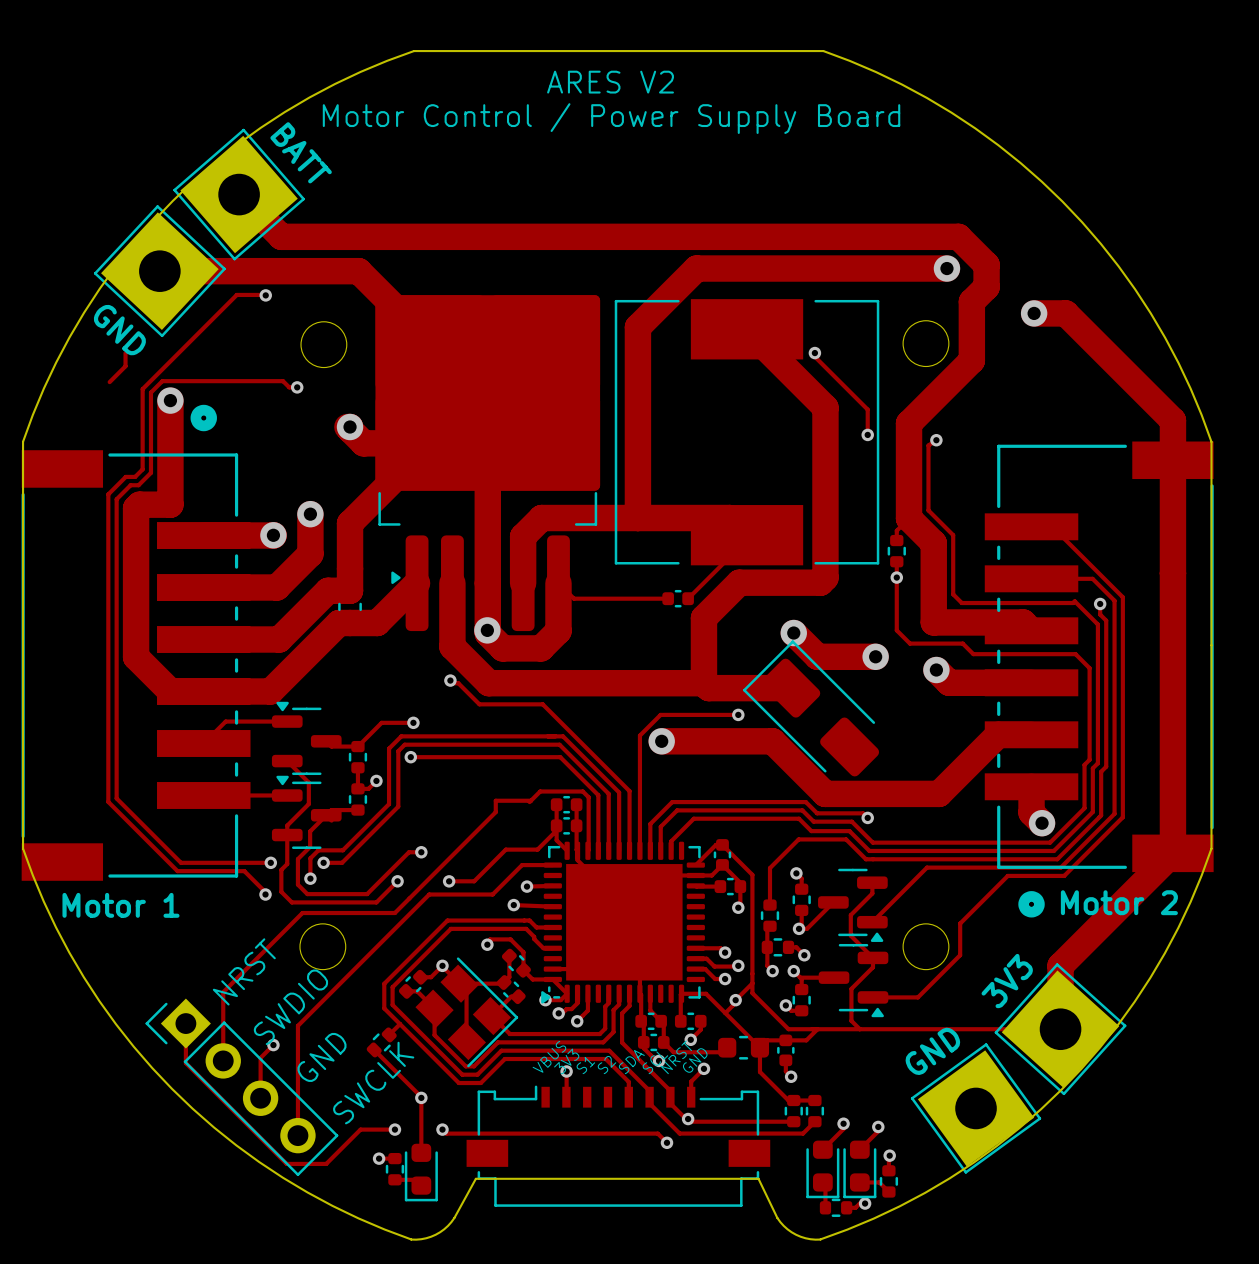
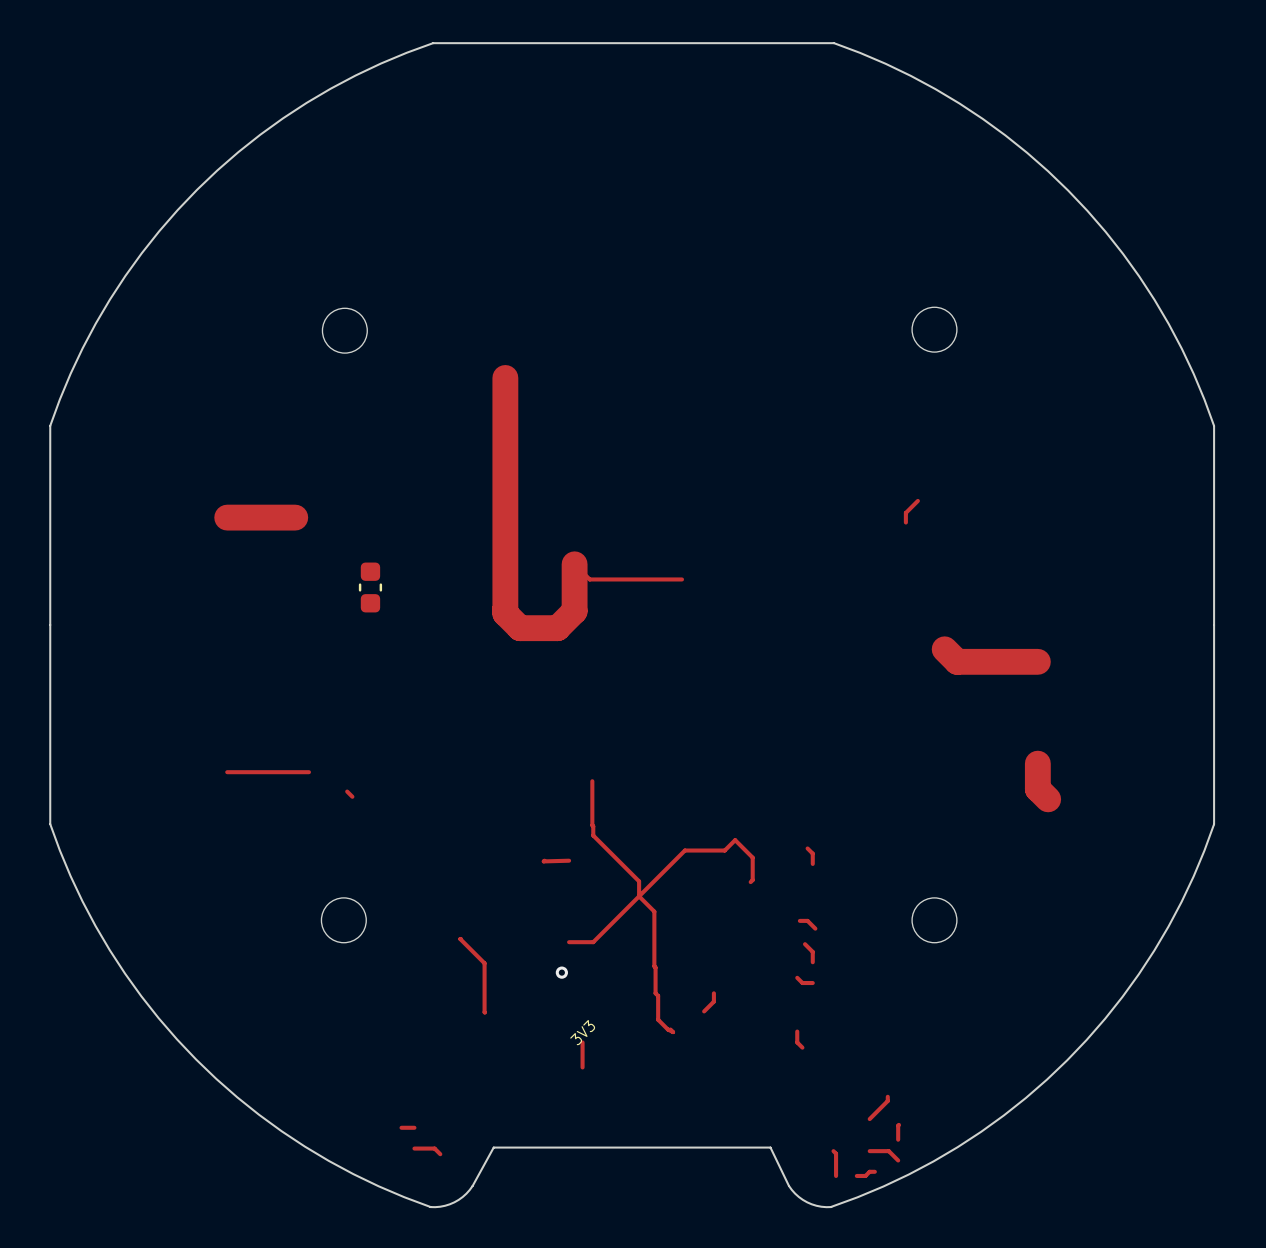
text: ARES V2 (610, 82) -> none
text: Motor Control / Power Supply Board (611, 118) -> none
text: BATT (301, 152) -> none
track: (239, 194) (281, 236) (958, 236) (986, 264) (986, 287) (971, 301) (971, 360) (909, 423) (909, 518) (933, 543) (933, 622) (1023, 622) (1031, 630) -> none
part: (239, 194) -> none
track: (946, 268) (696, 268) (637, 327) (637, 518) -> none
via: (946, 268) -> none
track: (159, 271) (358, 271) (430, 342) -> none
part: (159, 271) -> none
track: (265, 295) (236, 294) (142, 389) (142, 469) (135, 476) (125, 476) (108, 494) (108, 801) (177, 871) (244, 871) (265, 892) (265, 894) -> none
via: (265, 295) -> none
track: (1034, 313) (1065, 313) (1172, 420) (1172, 853) (1060, 965) (1060, 1029) (788, 1029) (752, 993) (752, 874) (722, 844) (716, 844) (695, 865) -> none
via: (1034, 313) -> none
track: (747, 329) (825, 407) (825, 577) (820, 582) (739, 582) (703, 618) (703, 683) -> none
text: GND (119, 330) -> none
track: (125, 353) (125, 366) (109, 382) -> none
track: (814, 353) (814, 356) (867, 409) (867, 434) -> none
via: (814, 353) -> none
track: (297, 387) (289, 387) (283, 381) (162, 381) (150, 392) (150, 472) (138, 485) (130, 485) (116, 499) (116, 798) (180, 862) (270, 862) -> none
via: (297, 387) -> none
track: (170, 400) (170, 504) (139, 504) (136, 508) (136, 657) (170, 691) (270, 691) (339, 623) (377, 623) (417, 583) -> none
via: (170, 400) -> none
track: (347, 427) (350, 427) (350, 429) (363, 443) (430, 443) (350, 523) (350, 590) (328, 590) (279, 639) (203, 639) -> none
via: (350, 427) -> none
part: (747, 432) -> none
via: (867, 434) -> none
track: (933, 440) (936, 440) (928, 445) (928, 510) (953, 535) (953, 594) (961, 603) (1073, 603) (1074, 601) (1097, 624) (1097, 763) (1092, 768) (1092, 812) (1053, 850) (869, 850) (849, 831) (811, 831) (798, 818) (693, 818) (671, 841) (671, 850) -> none
via: (936, 440) -> none
part: (487, 463) -> none
track: (310, 514) (310, 554) (276, 587) (203, 587) -> none
via: (310, 514) -> none
track: (1031, 526) (1052, 526) (1122, 597) (1122, 817) (1064, 875) (1007, 875) (960, 923) (960, 955) (917, 997) (873, 997) -> none
via: (273, 535) -> none
part: (896, 551) -> none
track: (896, 561) (896, 630) (909, 643) (962, 643) (973, 654) (1075, 654) (1089, 668) (1089, 759) (1084, 764) (1084, 808) (1050, 842) (872, 842) (851, 821) (813, 821) (802, 810) (677, 810) (660, 826) (660, 850) -> none
via: (896, 577) -> none
track: (1031, 578) (1092, 578) (1114, 600) (1114, 813) (1060, 867) (926, 867) (872, 922) -> none
track: (452, 583) (452, 646) (488, 683) (703, 683) -> none
track: (523, 583) (523, 536) (541, 518) (729, 518) (747, 535) (747, 539) (688, 598) -> none
part: (678, 598) -> none
track: (1100, 603) (1100, 614) (1106, 620) (1106, 766) (1101, 771) (1101, 815) (1057, 859) (865, 859) (846, 839) (798, 839) (770, 868) (770, 905) -> none
via: (1100, 603) -> none
via: (487, 630) -> none
track: (793, 633) (817, 656) (875, 656) -> none
via: (793, 633) -> none
part: (136, 642) -> none
via: (875, 656) -> none
via: (936, 670) -> none
part: (1099, 679) -> none
via: (450, 680) -> none
track: (453, 680) (450, 680) (458, 683) (479, 704) (542, 704) (629, 791) (629, 850) -> none
track: (703, 683) (708, 688) (790, 688) -> none
part: (811, 708) -> none
track: (738, 714) (660, 714) (639, 735) (639, 850) -> none
via: (738, 714) -> none
track: (287, 721) (225, 721) (203, 743) -> none
track: (413, 722) (381, 722) (357, 746) (331, 746) (326, 741) -> none
via: (413, 722) -> none
track: (1031, 734) (998, 734) (939, 793) (825, 793) (772, 741) (661, 741) -> none
part: (306, 738) -> none
via: (661, 741) -> none
part: (357, 757) -> none
track: (410, 757) (560, 757) (598, 795) (598, 850) -> none
via: (410, 757) -> none
track: (287, 761) (308, 782) (308, 804) (287, 825) (287, 864) (281, 869) (281, 891) (291, 902) (376, 902) (397, 881) -> none
track: (357, 767) (357, 788) (368, 788) (376, 780) -> none
via: (376, 780) -> none
part: (357, 799) -> none
track: (530, 800) (495, 800) (495, 812) (394, 913) (302, 913) (223, 992) (223, 1060) -> none
track: (529, 802) (540, 791) (582, 791) (588, 797) (587, 850) -> none
track: (556, 804) (556, 840) (567, 850) -> none
part: (566, 804) -> none
track: (357, 810) (331, 810) (310, 831) (310, 846) (297, 859) (297, 884) (307, 894) (367, 894) (408, 852) (421, 852) -> none
part: (306, 812) -> none
track: (867, 817) (863, 813) (817, 813) (805, 802) (672, 802) (650, 824) (650, 850) -> none
via: (867, 817) -> none
via: (1042, 823) -> none
part: (566, 825) -> none
track: (556, 830) (537, 849) (505, 849) (474, 881) (449, 881) -> none
track: (608, 850) (608, 793) (559, 744) (404, 744) (398, 751) (398, 806) (342, 862) (323, 862) -> none
track: (619, 850) (619, 792) (563, 736) (401, 736) (389, 748) (389, 804) (342, 850) (318, 850) (310, 858) (310, 878) -> none
via: (421, 852) -> none
part: (722, 854) -> none
via: (270, 862) -> none
via: (323, 862) -> none
track: (552, 865) (522, 865) (492, 894) (429, 894) (297, 1025) (297, 1135) -> none
via: (796, 873) -> none
via: (310, 878) -> none
via: (397, 881) -> none
via: (449, 881) -> none
track: (872, 882) (872, 893) (850, 915) (850, 935) (873, 957) (873, 967) (851, 988) (851, 1020) (859, 1029) -> none
track: (695, 885) (720, 886) -> none
via: (527, 886) -> none
part: (730, 886) -> none
via: (265, 894) -> none
part: (801, 899) -> none
track: (833, 902) (806, 928) (799, 928) (801, 926) (801, 910) -> none
text: Motor 2 (1119, 902) -> none
text: Motor 1 (120, 905) -> none
via: (513, 905) -> none
part: (852, 905) -> none
track: (515, 906) (513, 905) (552, 906) -> none
via: (738, 907) -> none
part: (770, 915) -> none
part: (623, 922) -> none
track: (552, 927) (536, 927) (529, 920) (447, 920) (384, 983) (384, 1008) (458, 1083) (480, 1083) (504, 1059) (605, 1059) (628, 1081) (628, 1097) -> none
via: (799, 928) -> none
track: (487, 942) (487, 944) (490, 939) (510, 939) (523, 952) (523, 970) (532, 979) (552, 979) (567, 993) (560, 1000) (545, 1000) -> none
via: (487, 944) -> none
part: (777, 947) -> none
track: (552, 948) (543, 948) (526, 928) (450, 928) (392, 987) (392, 1004) (462, 1074) (477, 1074) (501, 1050) (609, 1050) (649, 1090) (649, 1103) (679, 1133) (803, 1133) (814, 1121) -> none
track: (695, 948) (720, 948) (725, 952) -> none
via: (725, 952) -> none
via: (804, 955) -> none
track: (509, 956) (509, 977) (502, 983) (459, 983) -> none
track: (695, 958) (706, 958) (714, 966) (738, 965) -> none
part: (516, 963) -> none
via: (442, 965) -> none
via: (738, 965) -> none
track: (442, 966) (431, 977) (420, 977) -> none
track: (695, 969) (705, 969) (715, 979) (725, 979) -> none
text: NRST (244, 971) -> none
via: (772, 971) -> none
via: (793, 971) -> none
track: (800, 977) (834, 977) -> none
via: (725, 979) -> none
part: (853, 980) -> none
text: 3V3 (1007, 981) -> none
track: (752, 983) (725, 1013) -> none
part: (413, 984) -> none
part: (511, 989) -> none
track: (406, 991) (417, 991) (434, 1008) (434, 1035) (465, 1066) (474, 1066) (498, 1042) (603, 1042) (613, 1032) (613, 1010) (619, 1004) (619, 993) -> none
track: (577, 993) (577, 1003) (571, 1009) (566, 1009) (562, 1013) (558, 1013) (558, 1010) -> none
track: (587, 993) (587, 1010) (577, 1021) (574, 1021) -> none
track: (608, 993) (608, 1003) (605, 1006) (605, 1028) (599, 1034) (509, 1034) (491, 1016) (511, 996) (518, 996) -> none
track: (629, 993) (629, 1005) (622, 1013) (622, 1042) (670, 1090) (670, 1103) (688, 1119) (688, 1121) (793, 1121) -> none
track: (650, 993) (650, 1010) (663, 1023) (663, 1042) (673, 1052) (722, 1052) (727, 1047) -> none
via: (735, 1000) -> none
part: (801, 1000) -> none
via: (785, 1005) -> none
text: SWDIO (290, 1007) -> none
part: (466, 1012) -> none
via: (558, 1013) -> none
via: (577, 1021) -> none
part: (651, 1021) -> none
track: (680, 1021) (680, 994) (706, 993) (759, 1047) -> none
part: (690, 1021) -> none
track: (185, 1023) (185, 1063) (286, 1163) (326, 1163) (360, 1129) (394, 1129) -> none
track: (400, 1024) (389, 1034) -> none
track: (817, 1029) (806, 1040) (767, 1040) (759, 1047) -> none
part: (1060, 1029) -> none
via: (690, 1039) -> none
part: (381, 1042) -> none
part: (653, 1042) -> none
track: (273, 1045) (260, 1057) (260, 1098) -> none
via: (273, 1045) -> none
part: (743, 1047) -> none
track: (759, 1047) (759, 1071) (788, 1100) (814, 1100) -> none
track: (374, 1049) (421, 1097) (421, 1152) -> none
part: (785, 1050) -> none
text: GND (932, 1051) -> none
text: VBUS (549, 1056) -> none
text: GND (321, 1057) -> none
text: NRST (676, 1057) -> none
via: (659, 1060) -> none
text: GND (695, 1060) -> none
text: SDA (631, 1062) -> none
text: SCL (655, 1062) -> none
text: S1 (585, 1065) -> none
text: S2 (607, 1065) -> none
track: (703, 1068) (691, 1081) (691, 1097) -> none
via: (703, 1068) -> none
via: (566, 1071) -> none
via: (791, 1076) -> none
text: SWCLK (373, 1083) -> none
part: (241, 1087) -> none
via: (421, 1097) -> none
part: (976, 1108) -> none
part: (793, 1111) -> none
part: (814, 1111) -> none
via: (688, 1119) -> none
track: (843, 1123) (843, 1129) (822, 1149) -> none
via: (843, 1123) -> none
via: (878, 1126) -> none
via: (394, 1129) -> none
track: (442, 1129) (446, 1133) (657, 1133) (666, 1142) -> none
via: (442, 1129) -> none
via: (666, 1142) -> none
part: (618, 1146) -> none
via: (889, 1155) -> none
via: (379, 1158) -> none
part: (394, 1169) -> none
part: (822, 1169) -> none
part: (859, 1169) -> none
part: (421, 1172) -> none
part: (888, 1181) -> none
via: (865, 1203) -> none
part: (836, 1207) -> none

